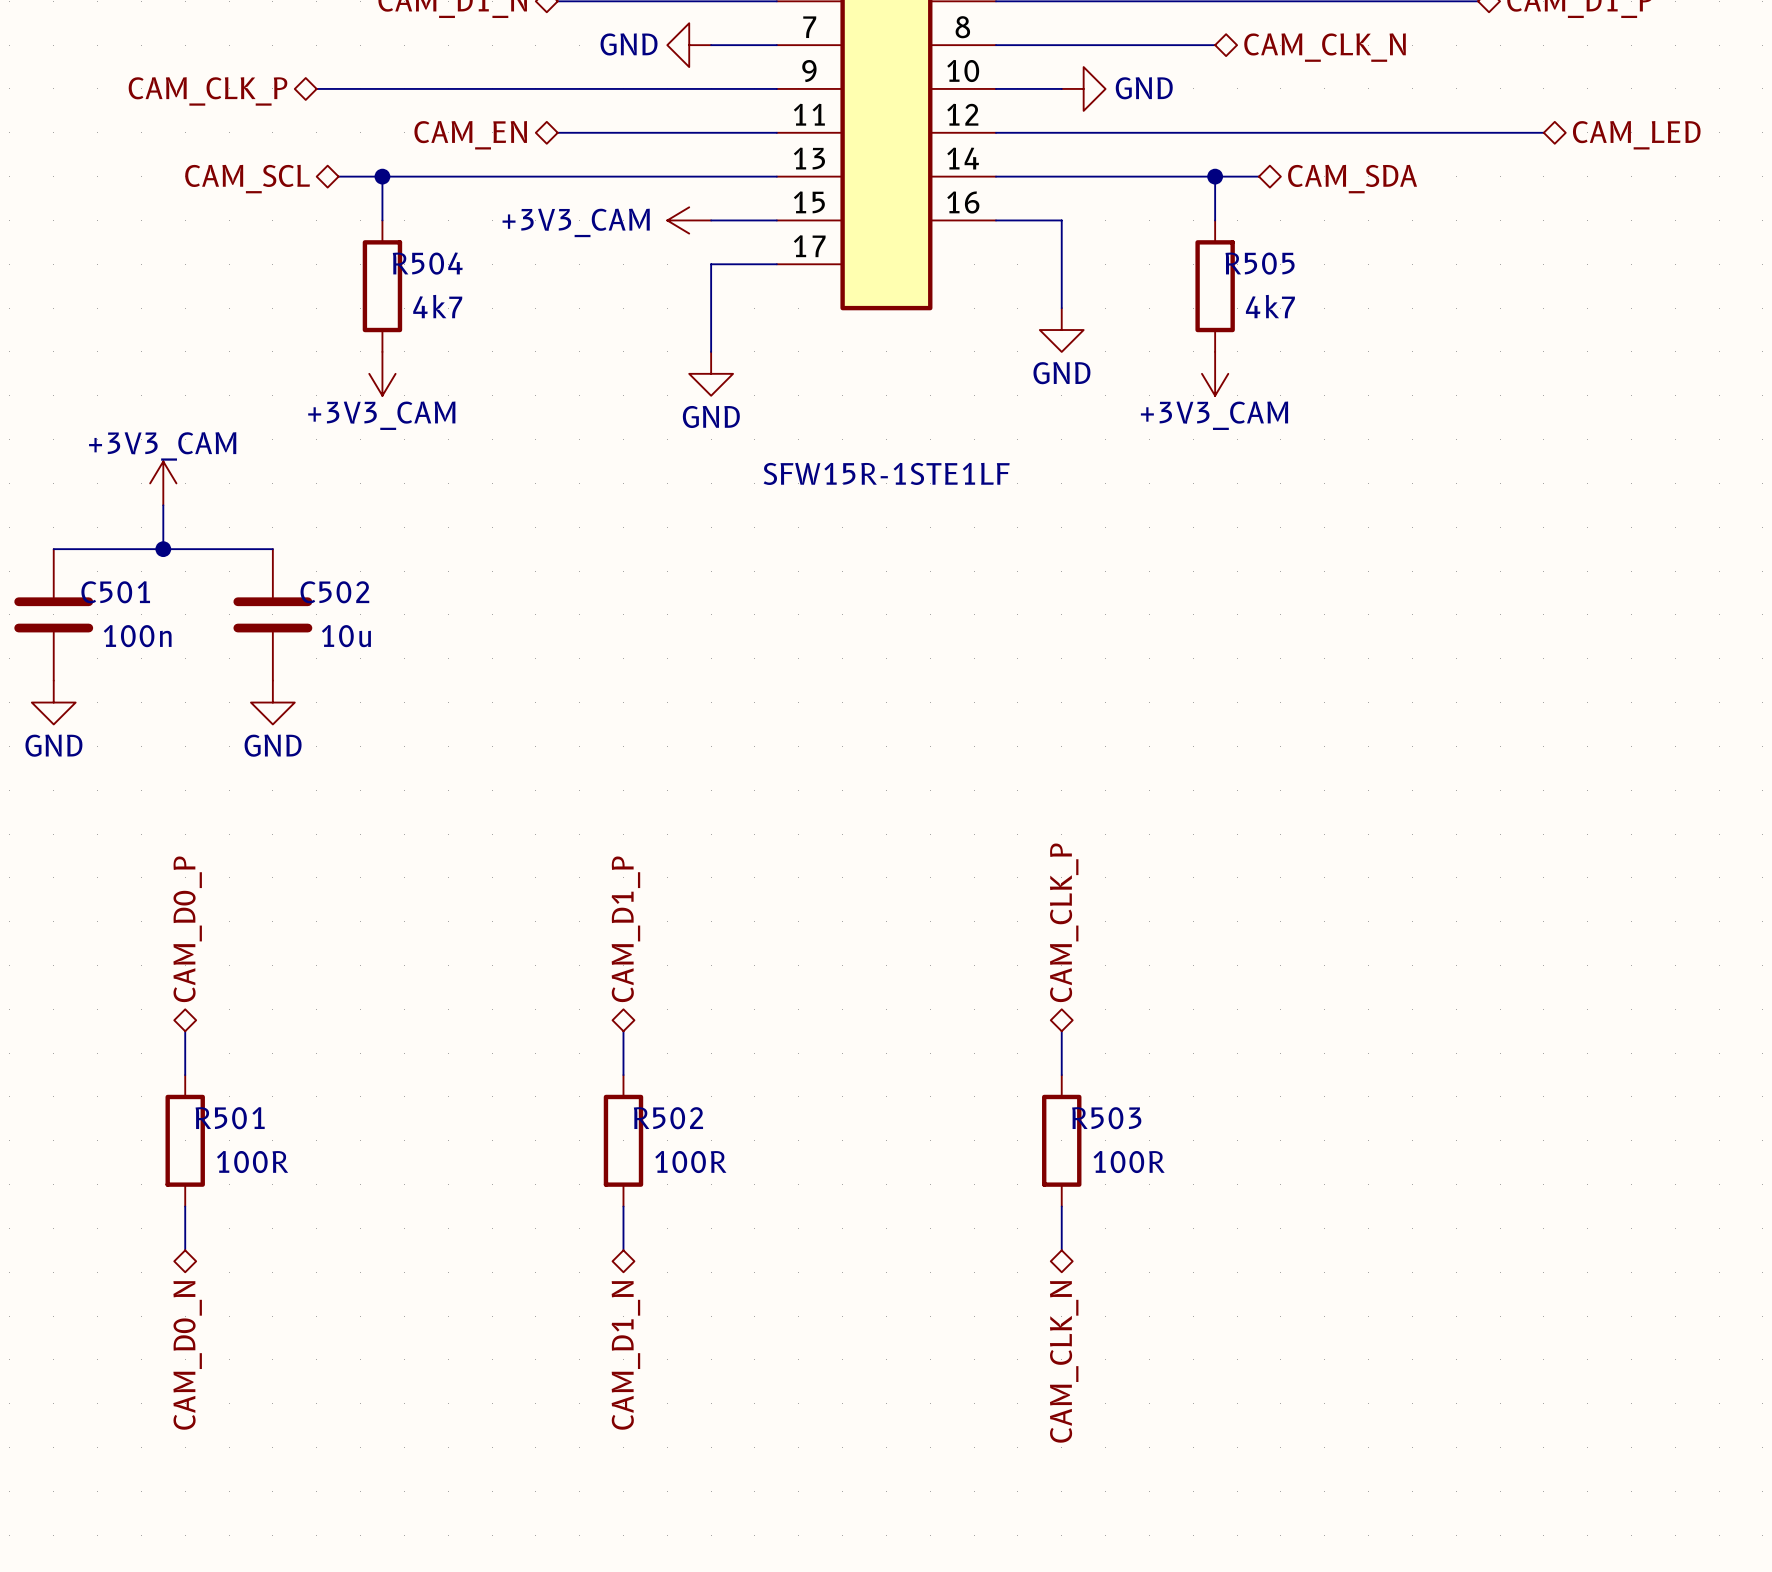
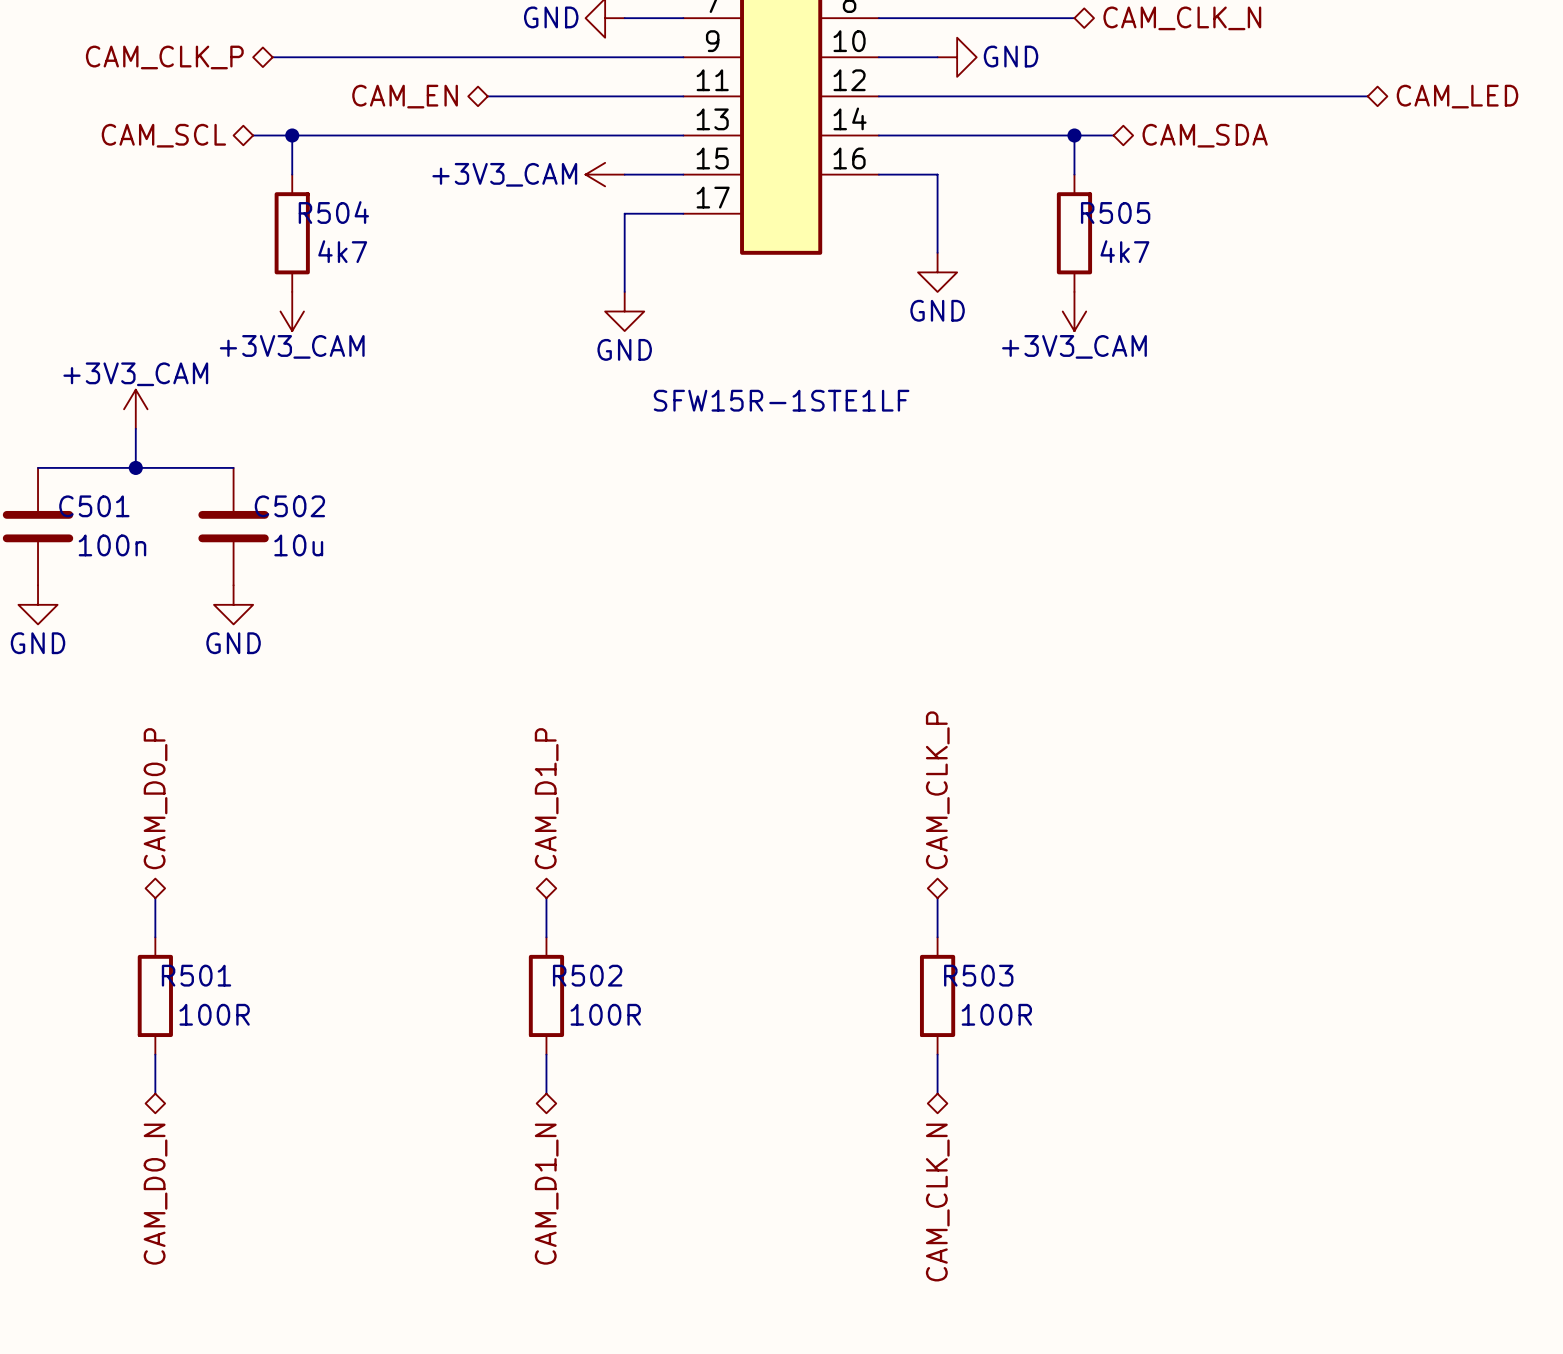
wire: none -> (253, 135) (292, 135) (292, 174)
wire: (382, 176) (382, 220) -> none
junction position: (382, 176) -> (292, 135)
hierarchical label position: CAM_SCL (247, 179) -> CAM_SCL (163, 135)
R504 position: (382, 286) -> (292, 233)
power symbol position: +3V3_CAM (382, 373) -> +3V3_CAM (292, 311)

